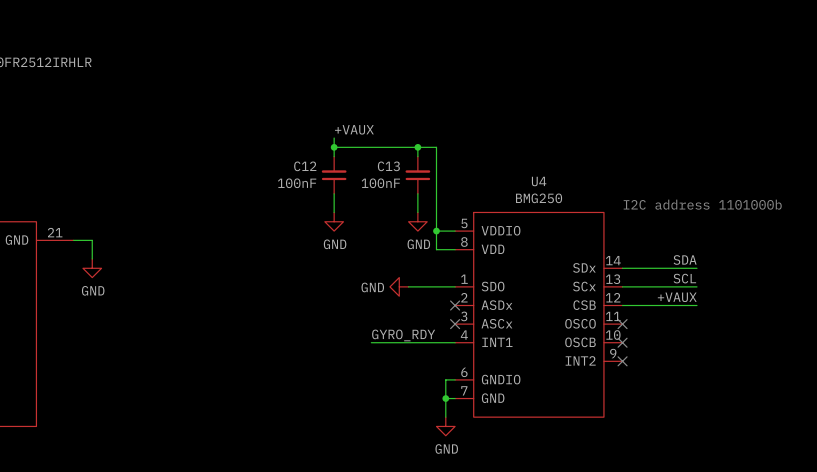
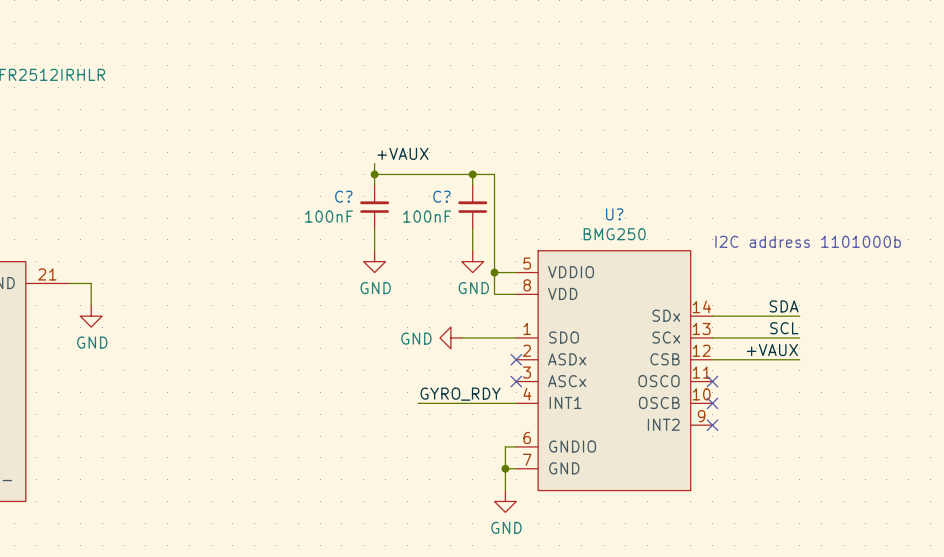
C12 name: C12 (305, 166) -> C? (343, 196)
C13 name: C13 (388, 166) -> C? (441, 196)
U4 name: U4 (539, 181) -> U? (614, 214)

